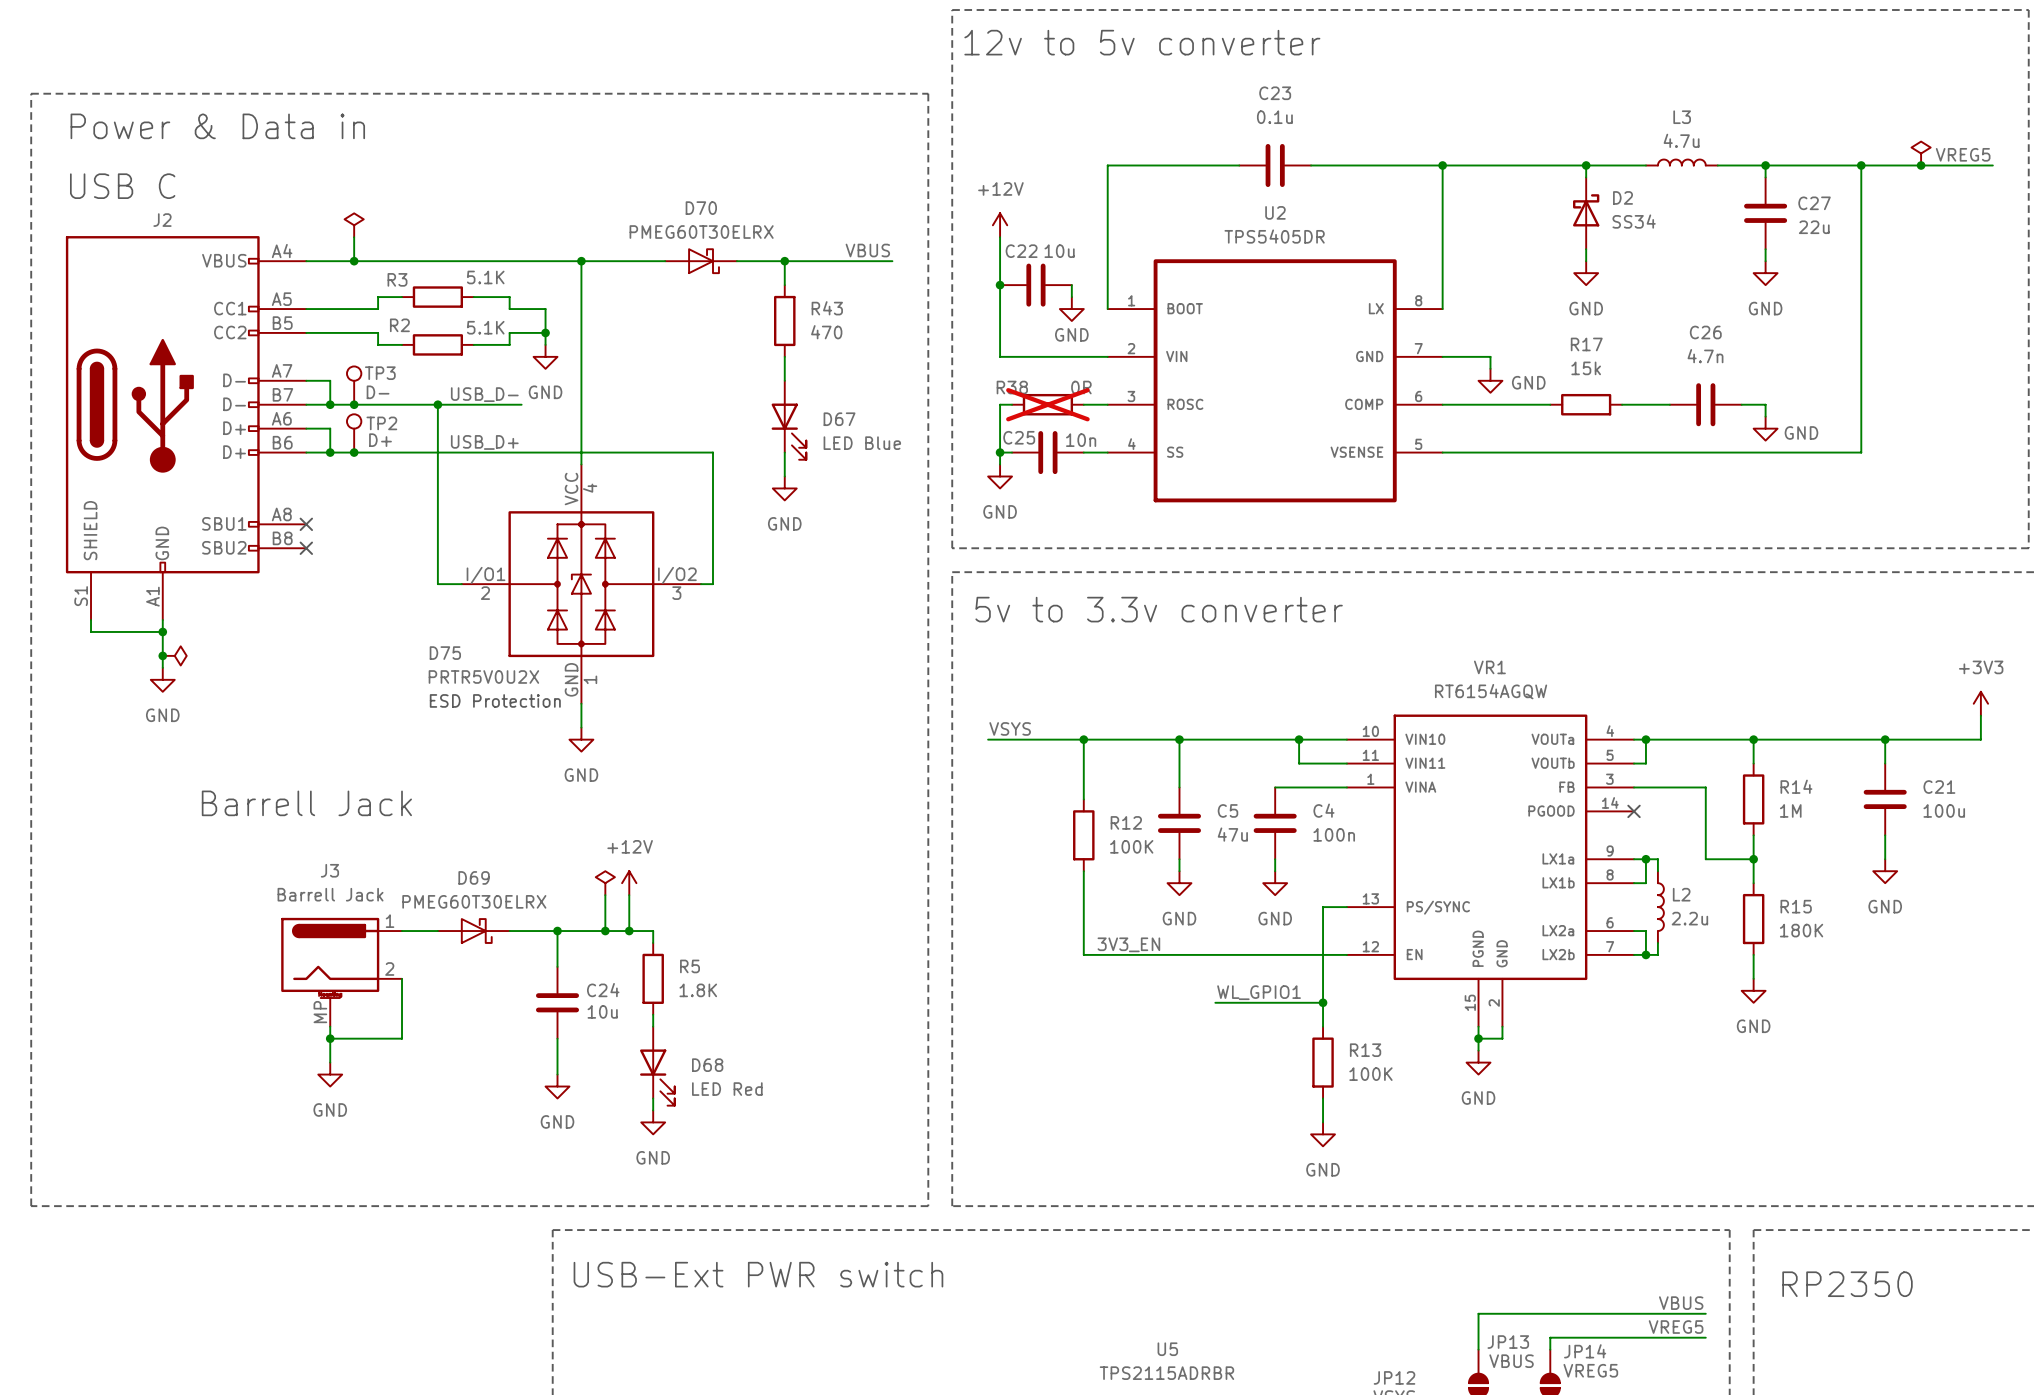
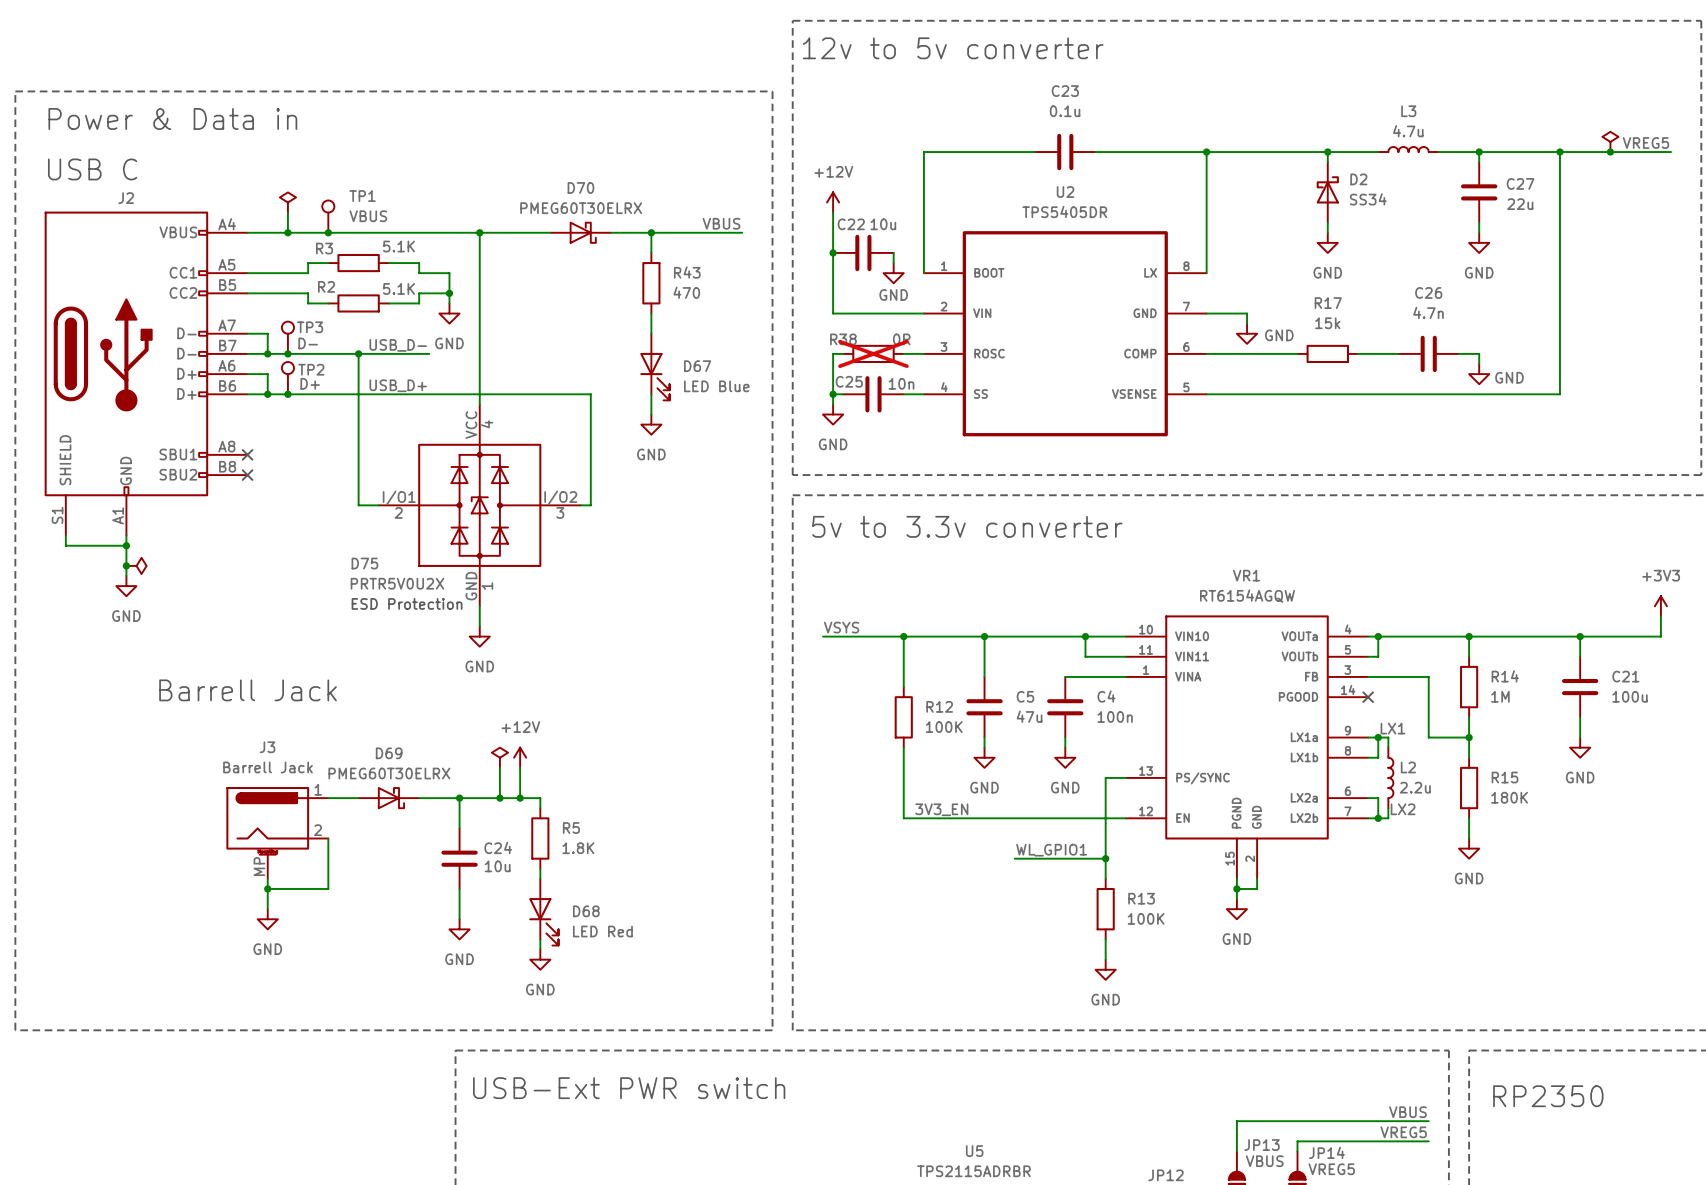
TP1: none -> VBUS (328, 216)
junction: none -> (328, 232)
label: none -> LX1 (1392, 728)
label: none -> LX2 (1403, 809)

